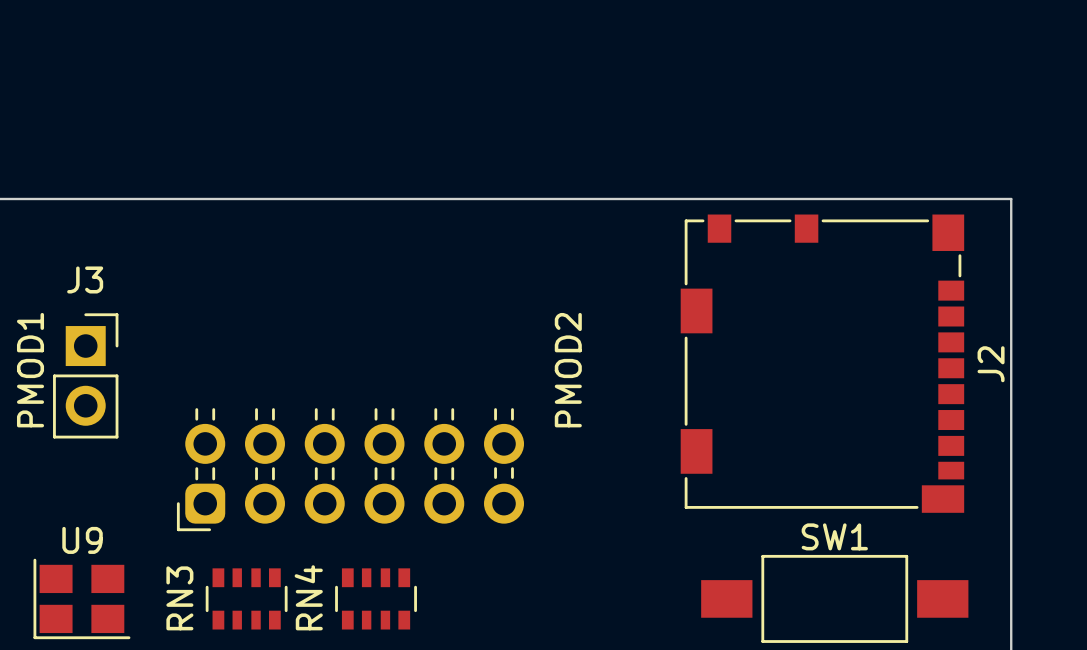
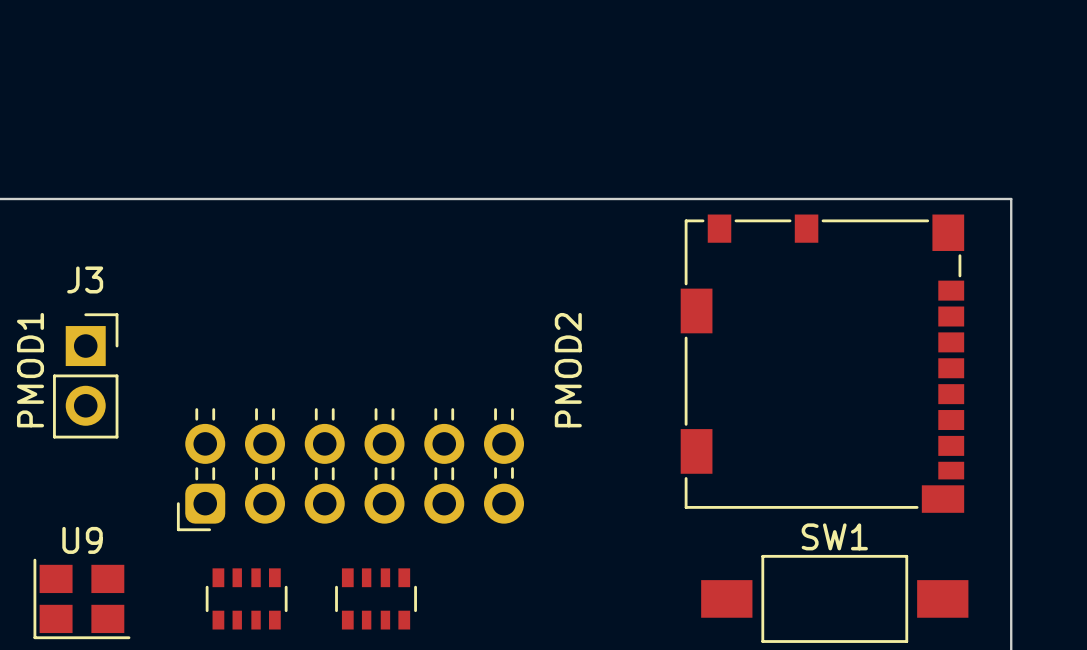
J2 name: J2 (991, 364) -> none
RN4 name: RN4 (308, 597) -> none
RN3 name: RN3 (179, 598) -> none

